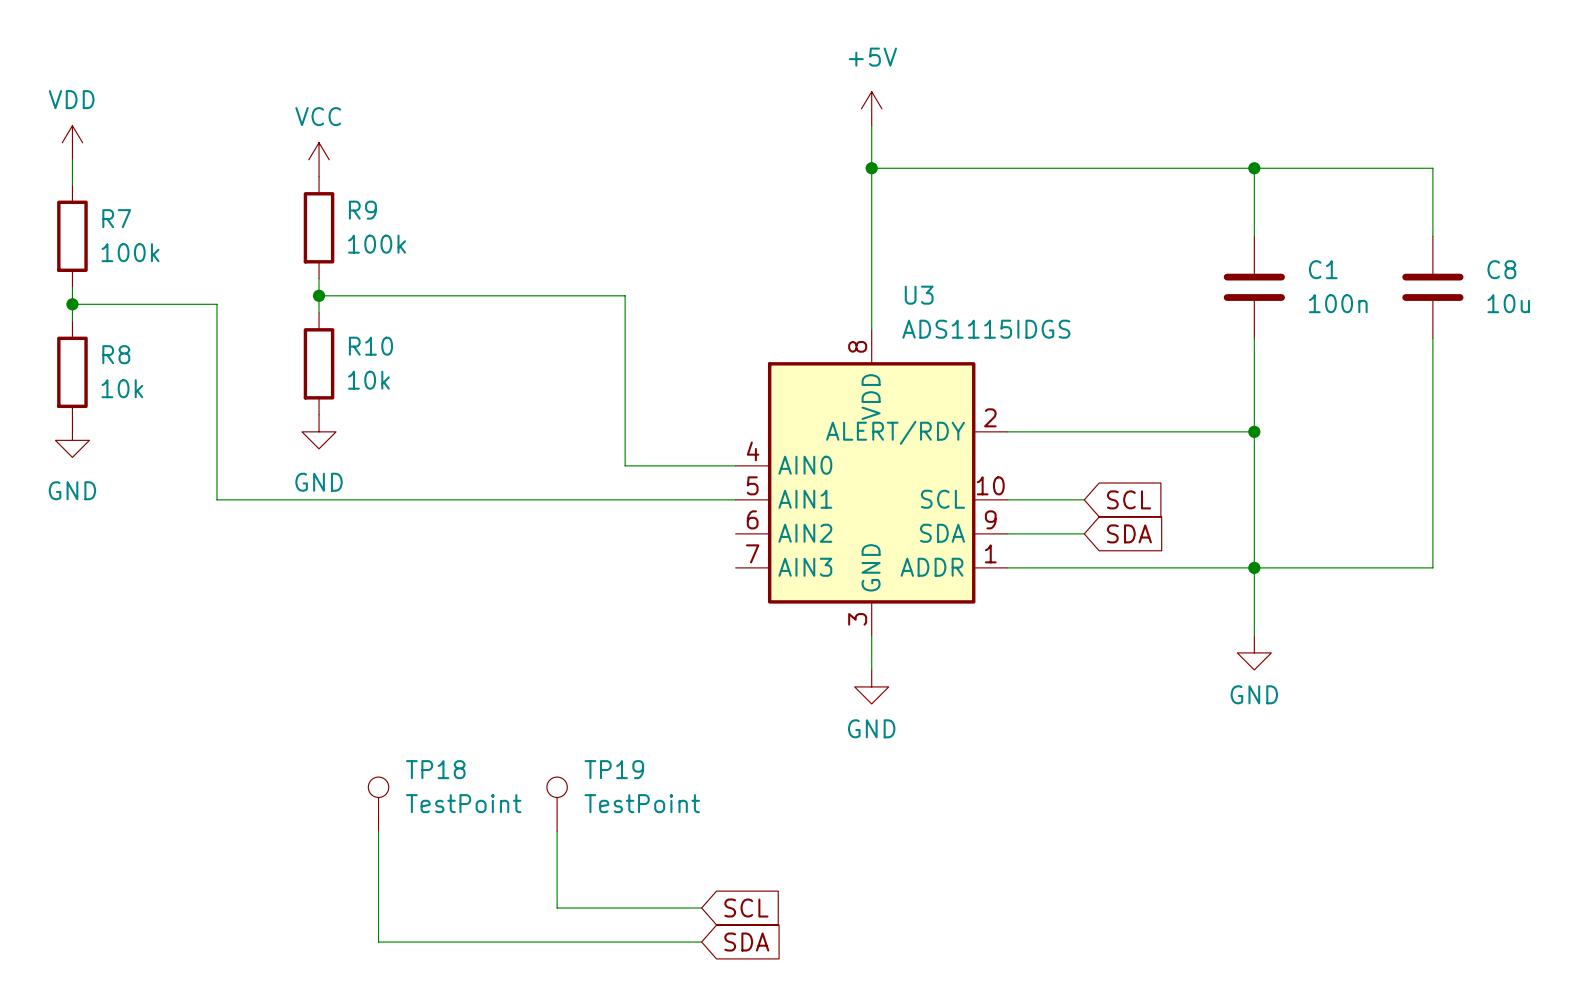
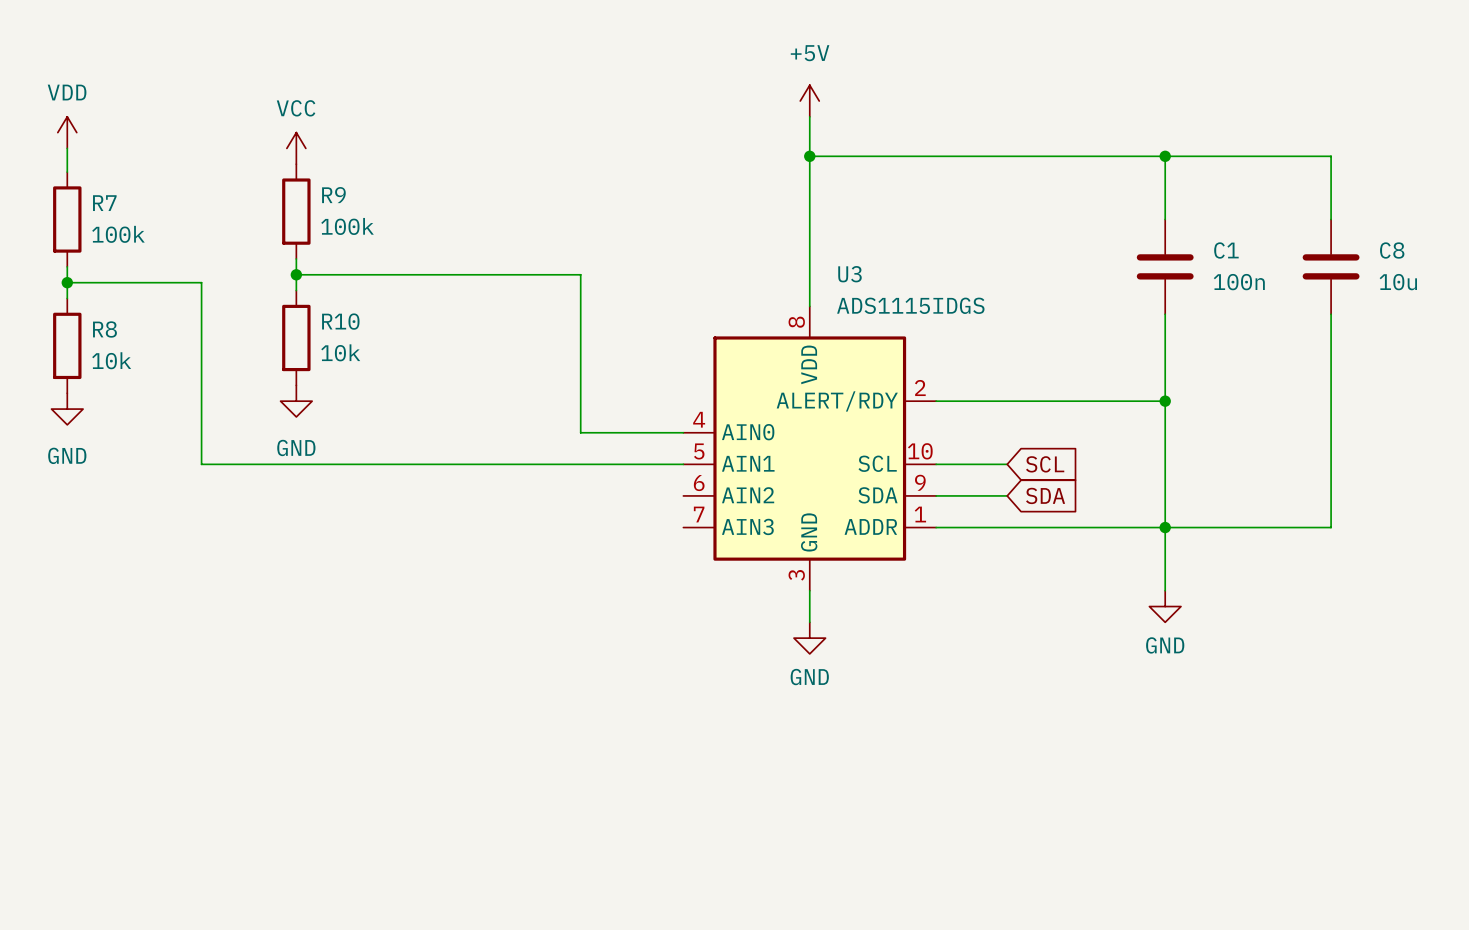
TP18: TestPoint (378, 804) -> none
TP19: TestPoint (557, 804) -> none
wire: (378, 831) (378, 942) (701, 942) -> none
wire: (557, 831) (557, 908) (701, 908) -> none
global label: SCL (746, 908) -> none
global label: SDA (746, 942) -> none

